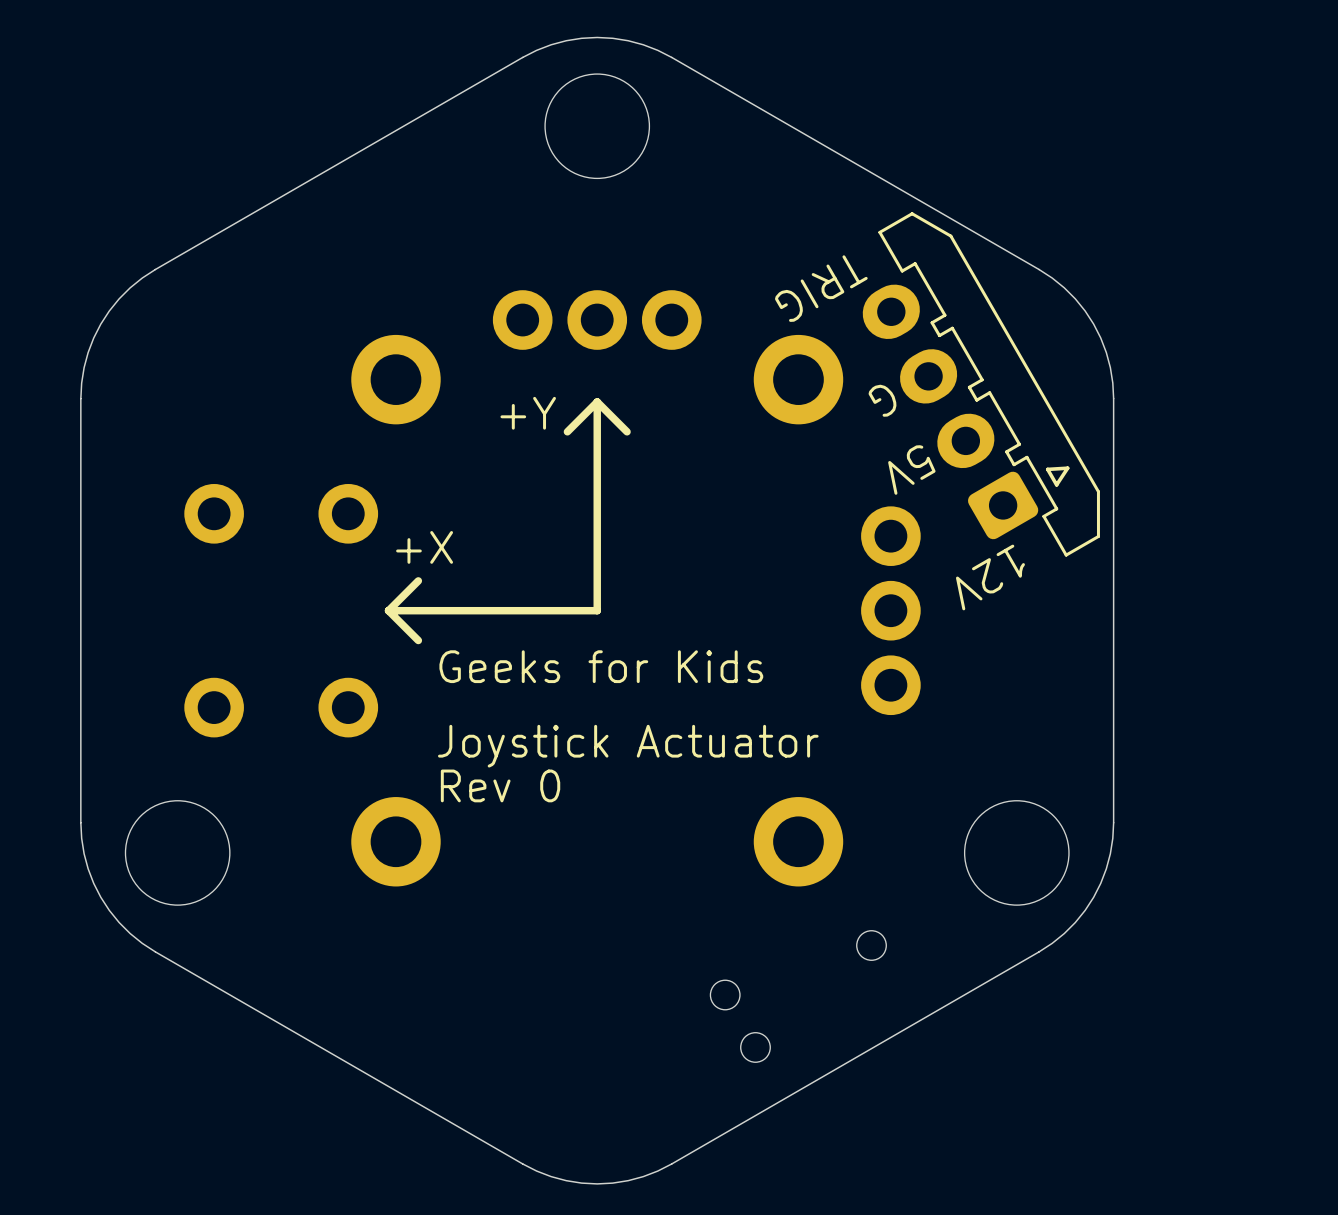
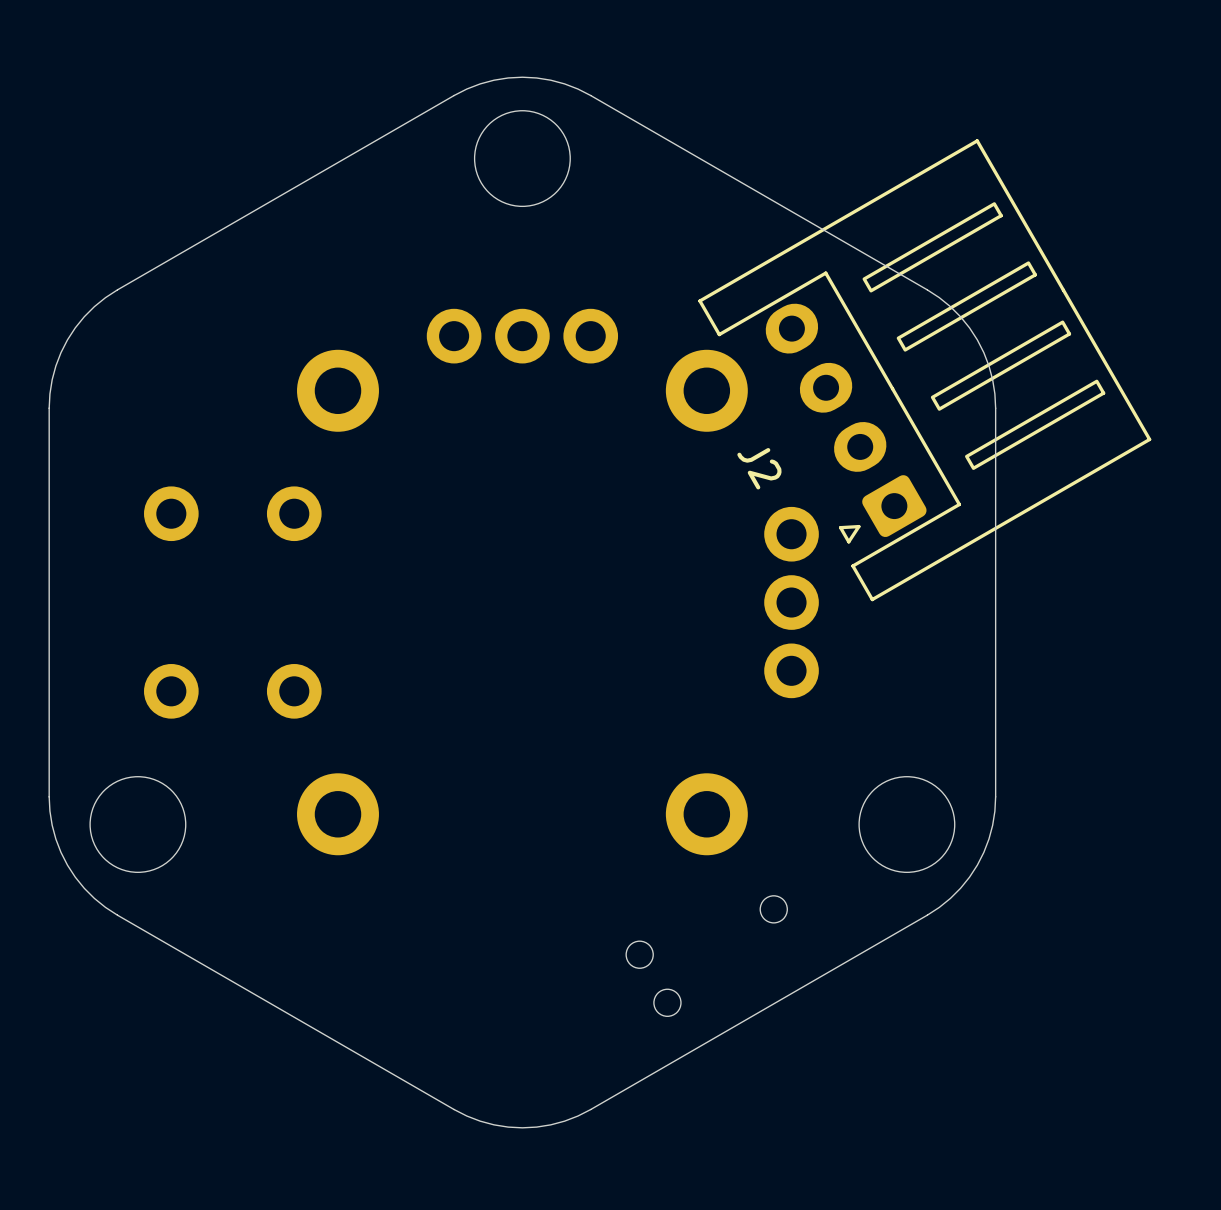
text: TRIG (821, 288) -> none
J2: none -> (924, 370)
part: (981, 384) -> none
text: G (882, 400) -> none
line: (597, 402) (627, 431) -> none
line: (597, 402) (567, 431) -> none
line: (597, 402) (597, 610) (388, 610) -> none
text: +Y (528, 413) -> none
text: 5V (911, 470) -> none
text: +X (424, 547) -> none
text: 12V (990, 577) -> none
line: (418, 580) (388, 610) -> none
line: (388, 610) (418, 640) -> none
text: Geeks for Kids (601, 666) -> none
text: Joystick Actuator (628, 746) -> none
text: Rev 0 (500, 785) -> none

